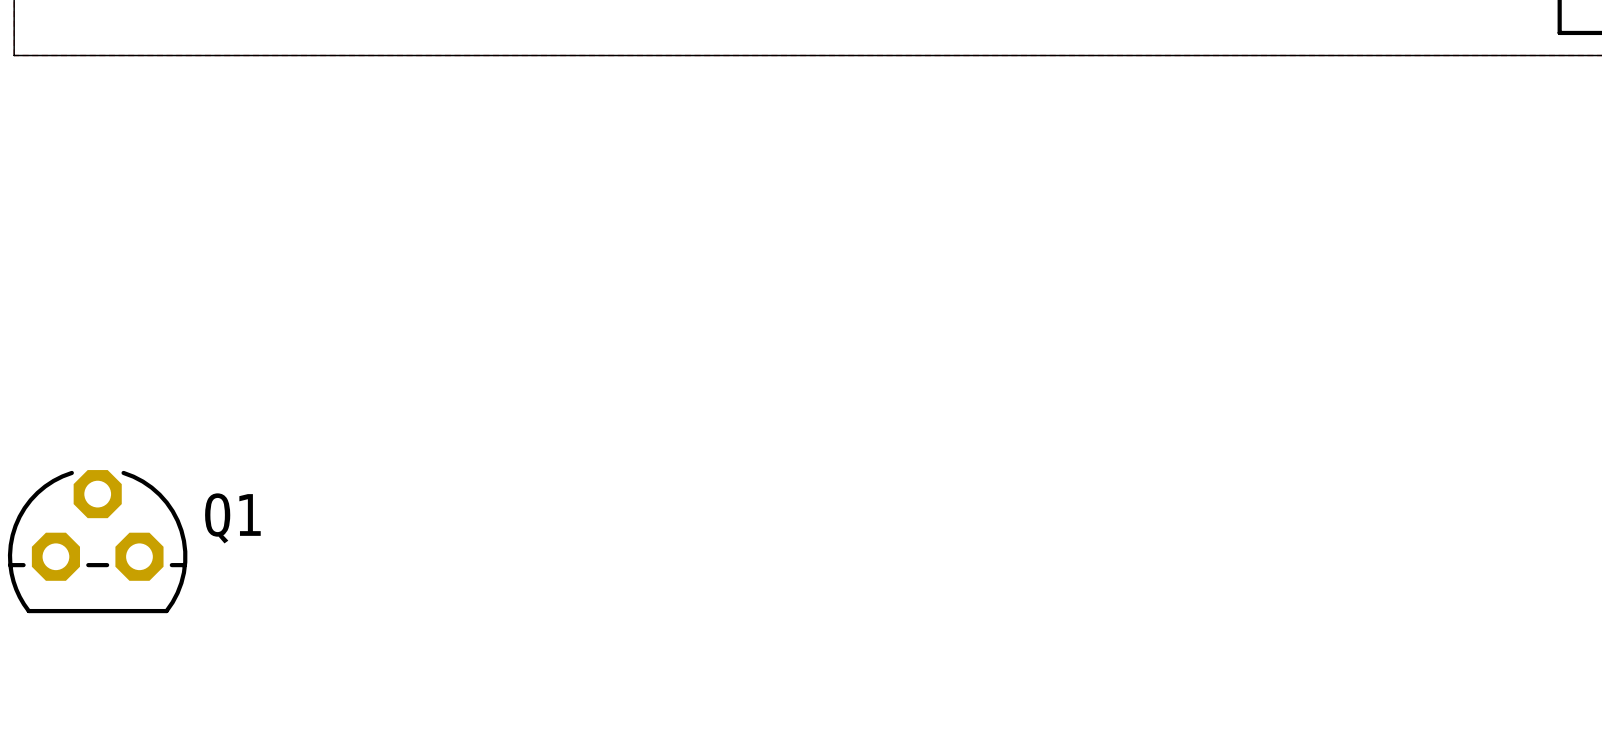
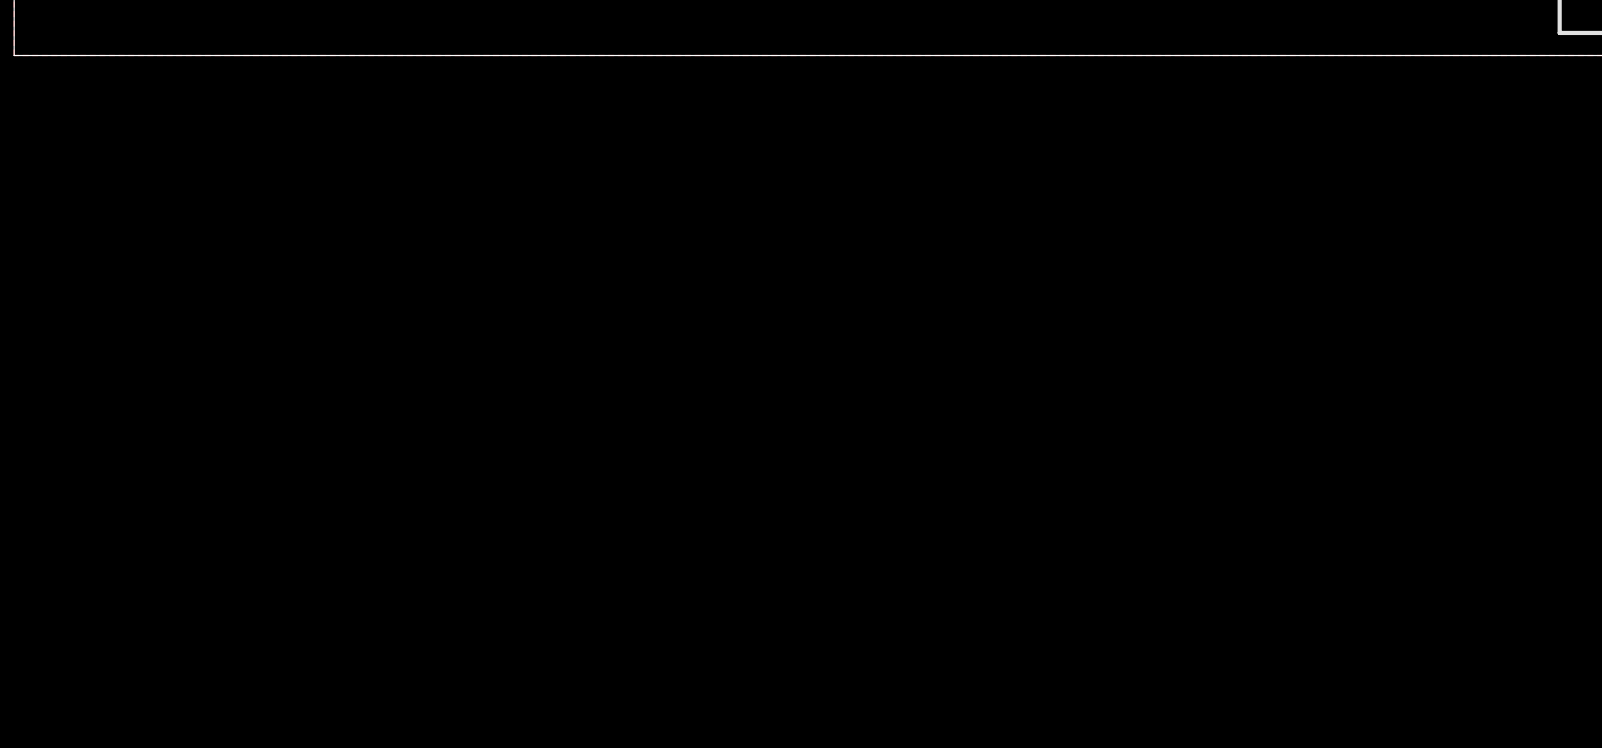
Q1: (97, 541) -> none

